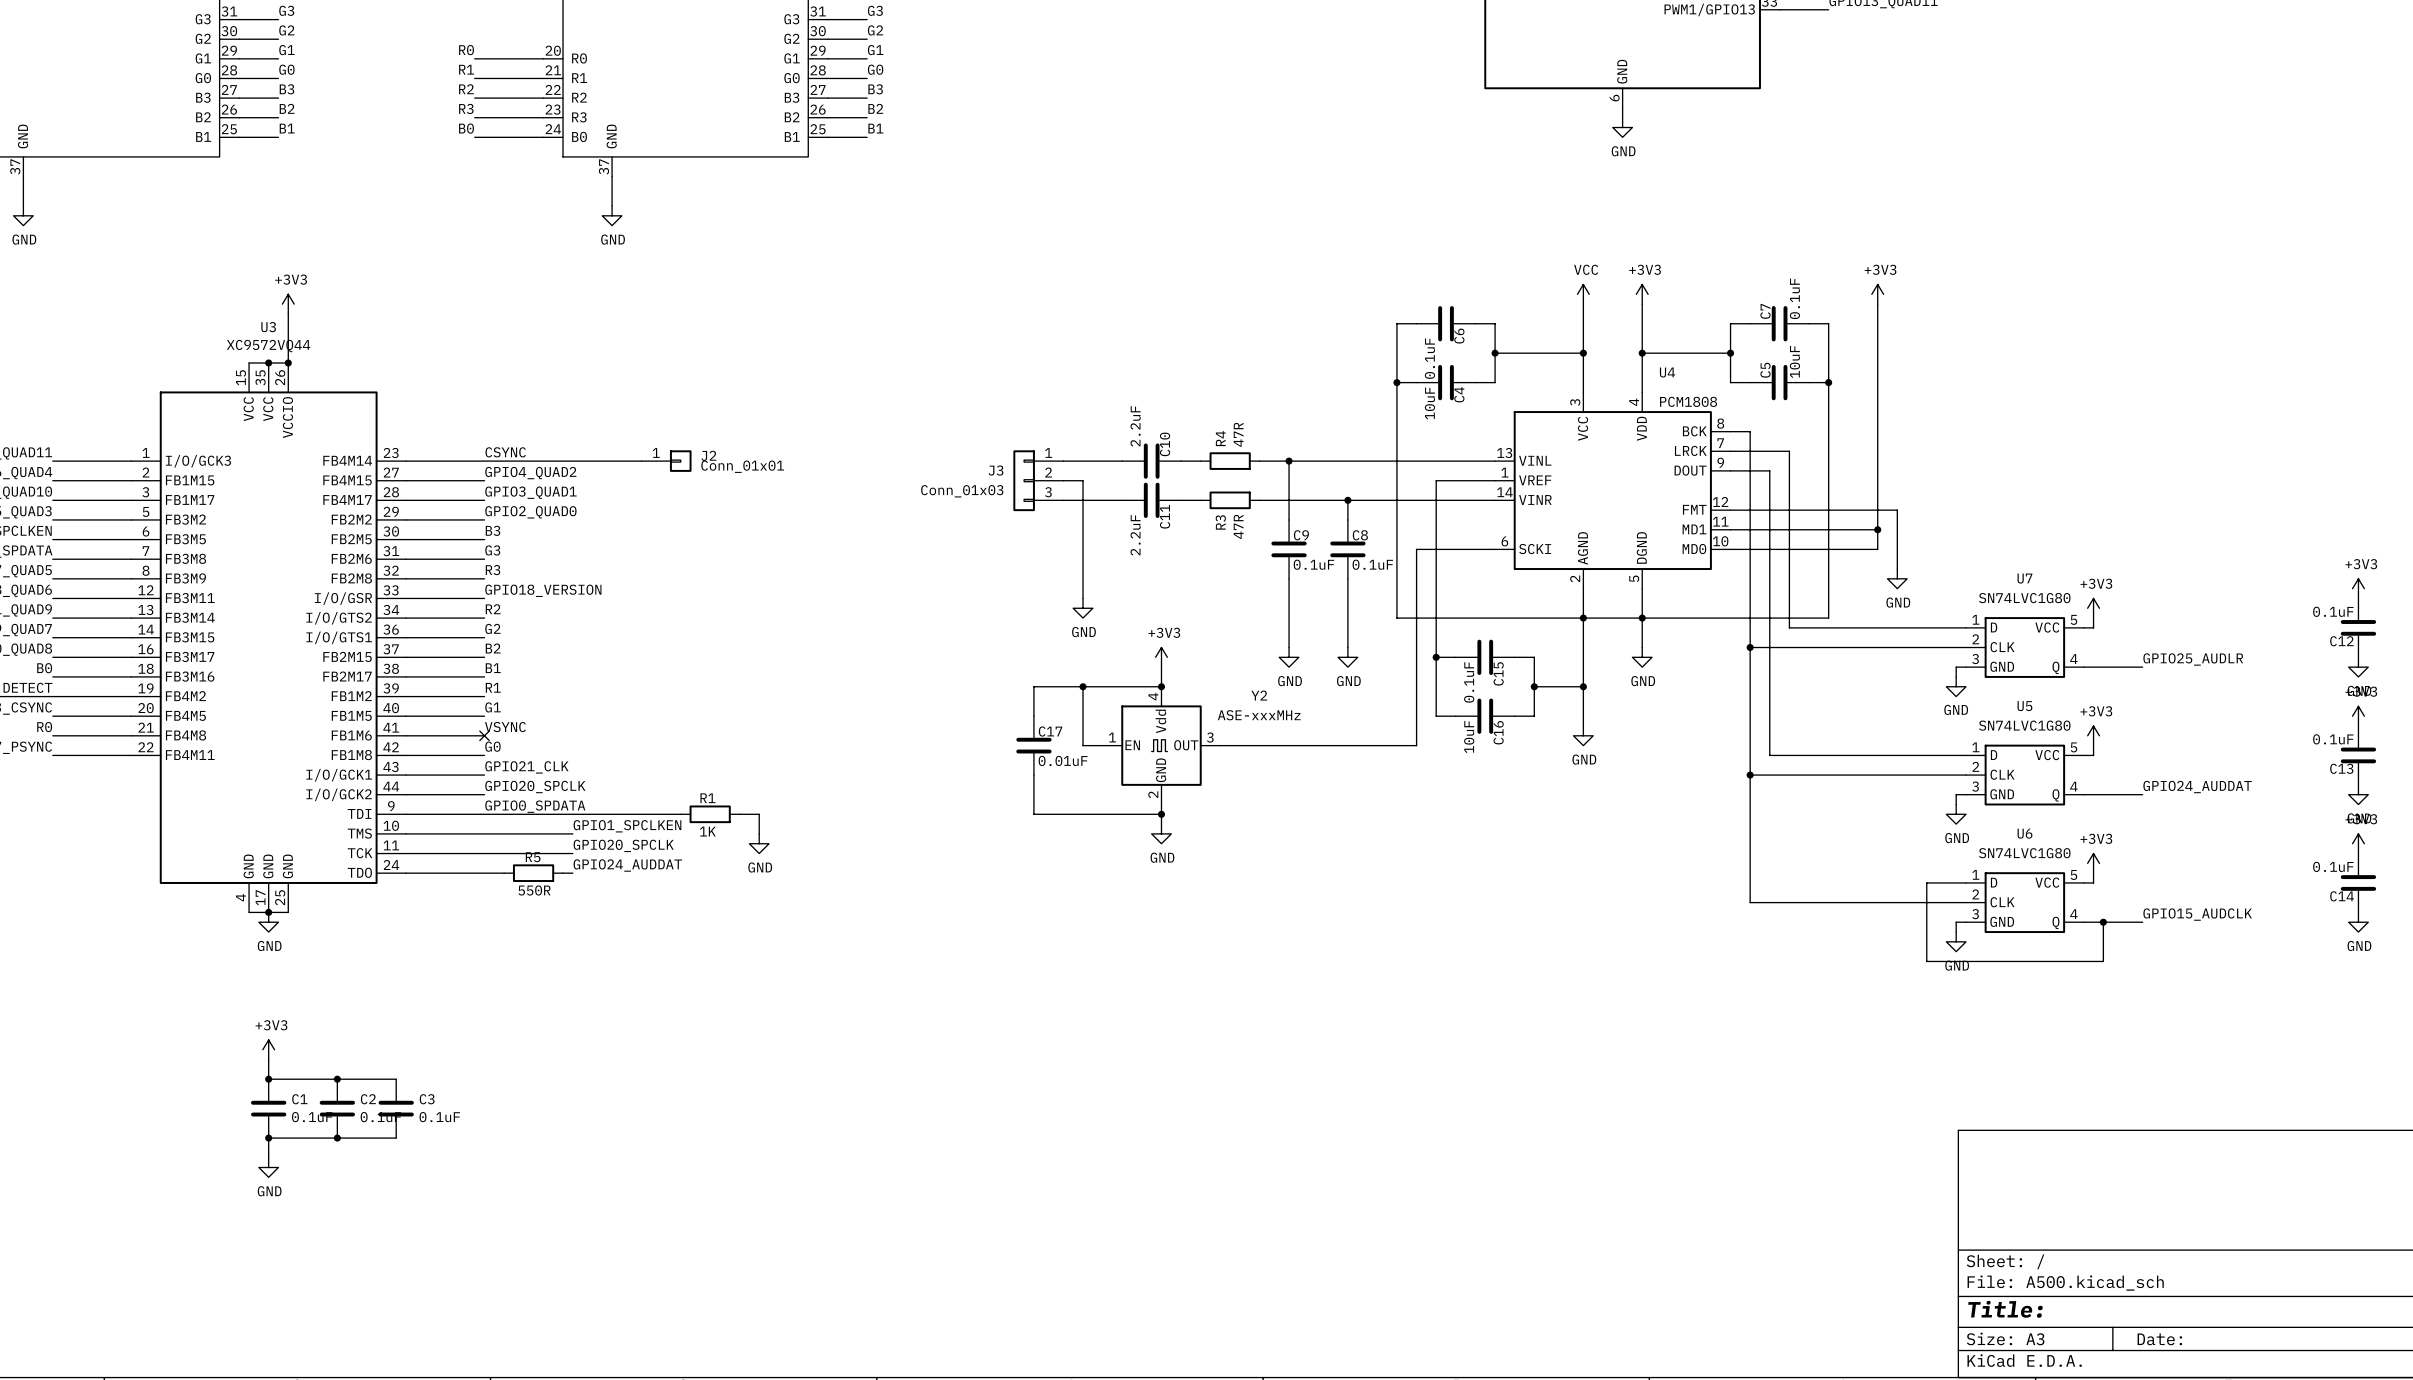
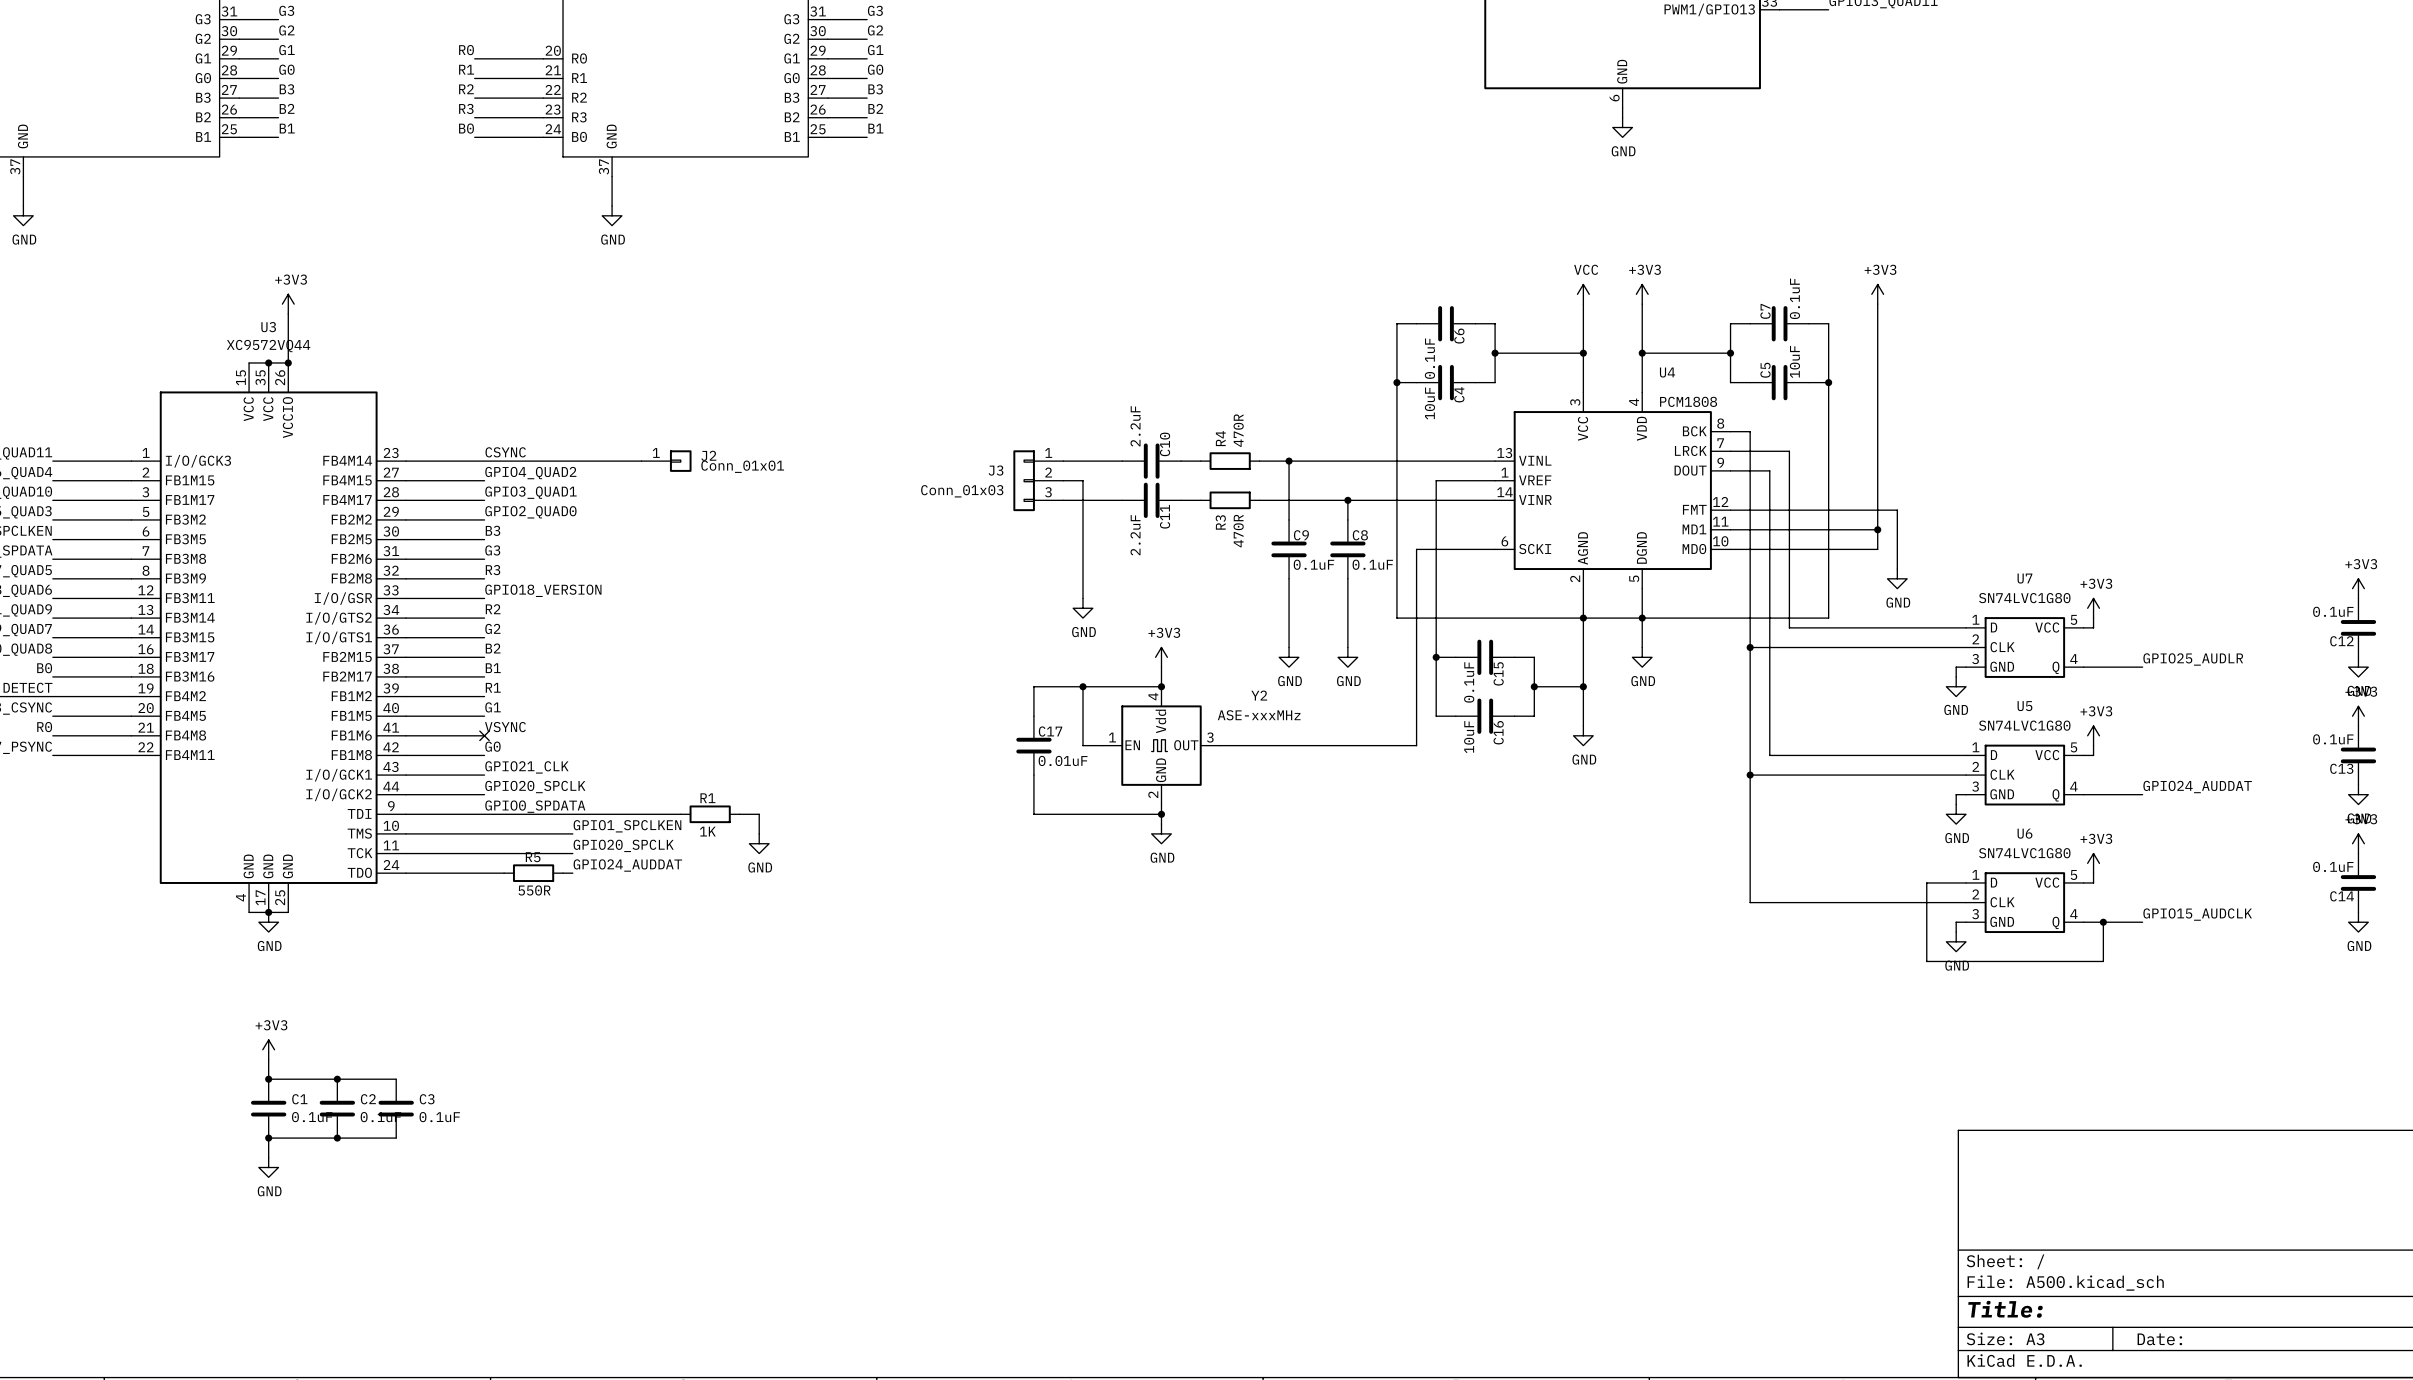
R4 value: 47R (1238, 434) -> 470R (1238, 430)
R3 value: 47R (1238, 526) -> 470R (1238, 531)

